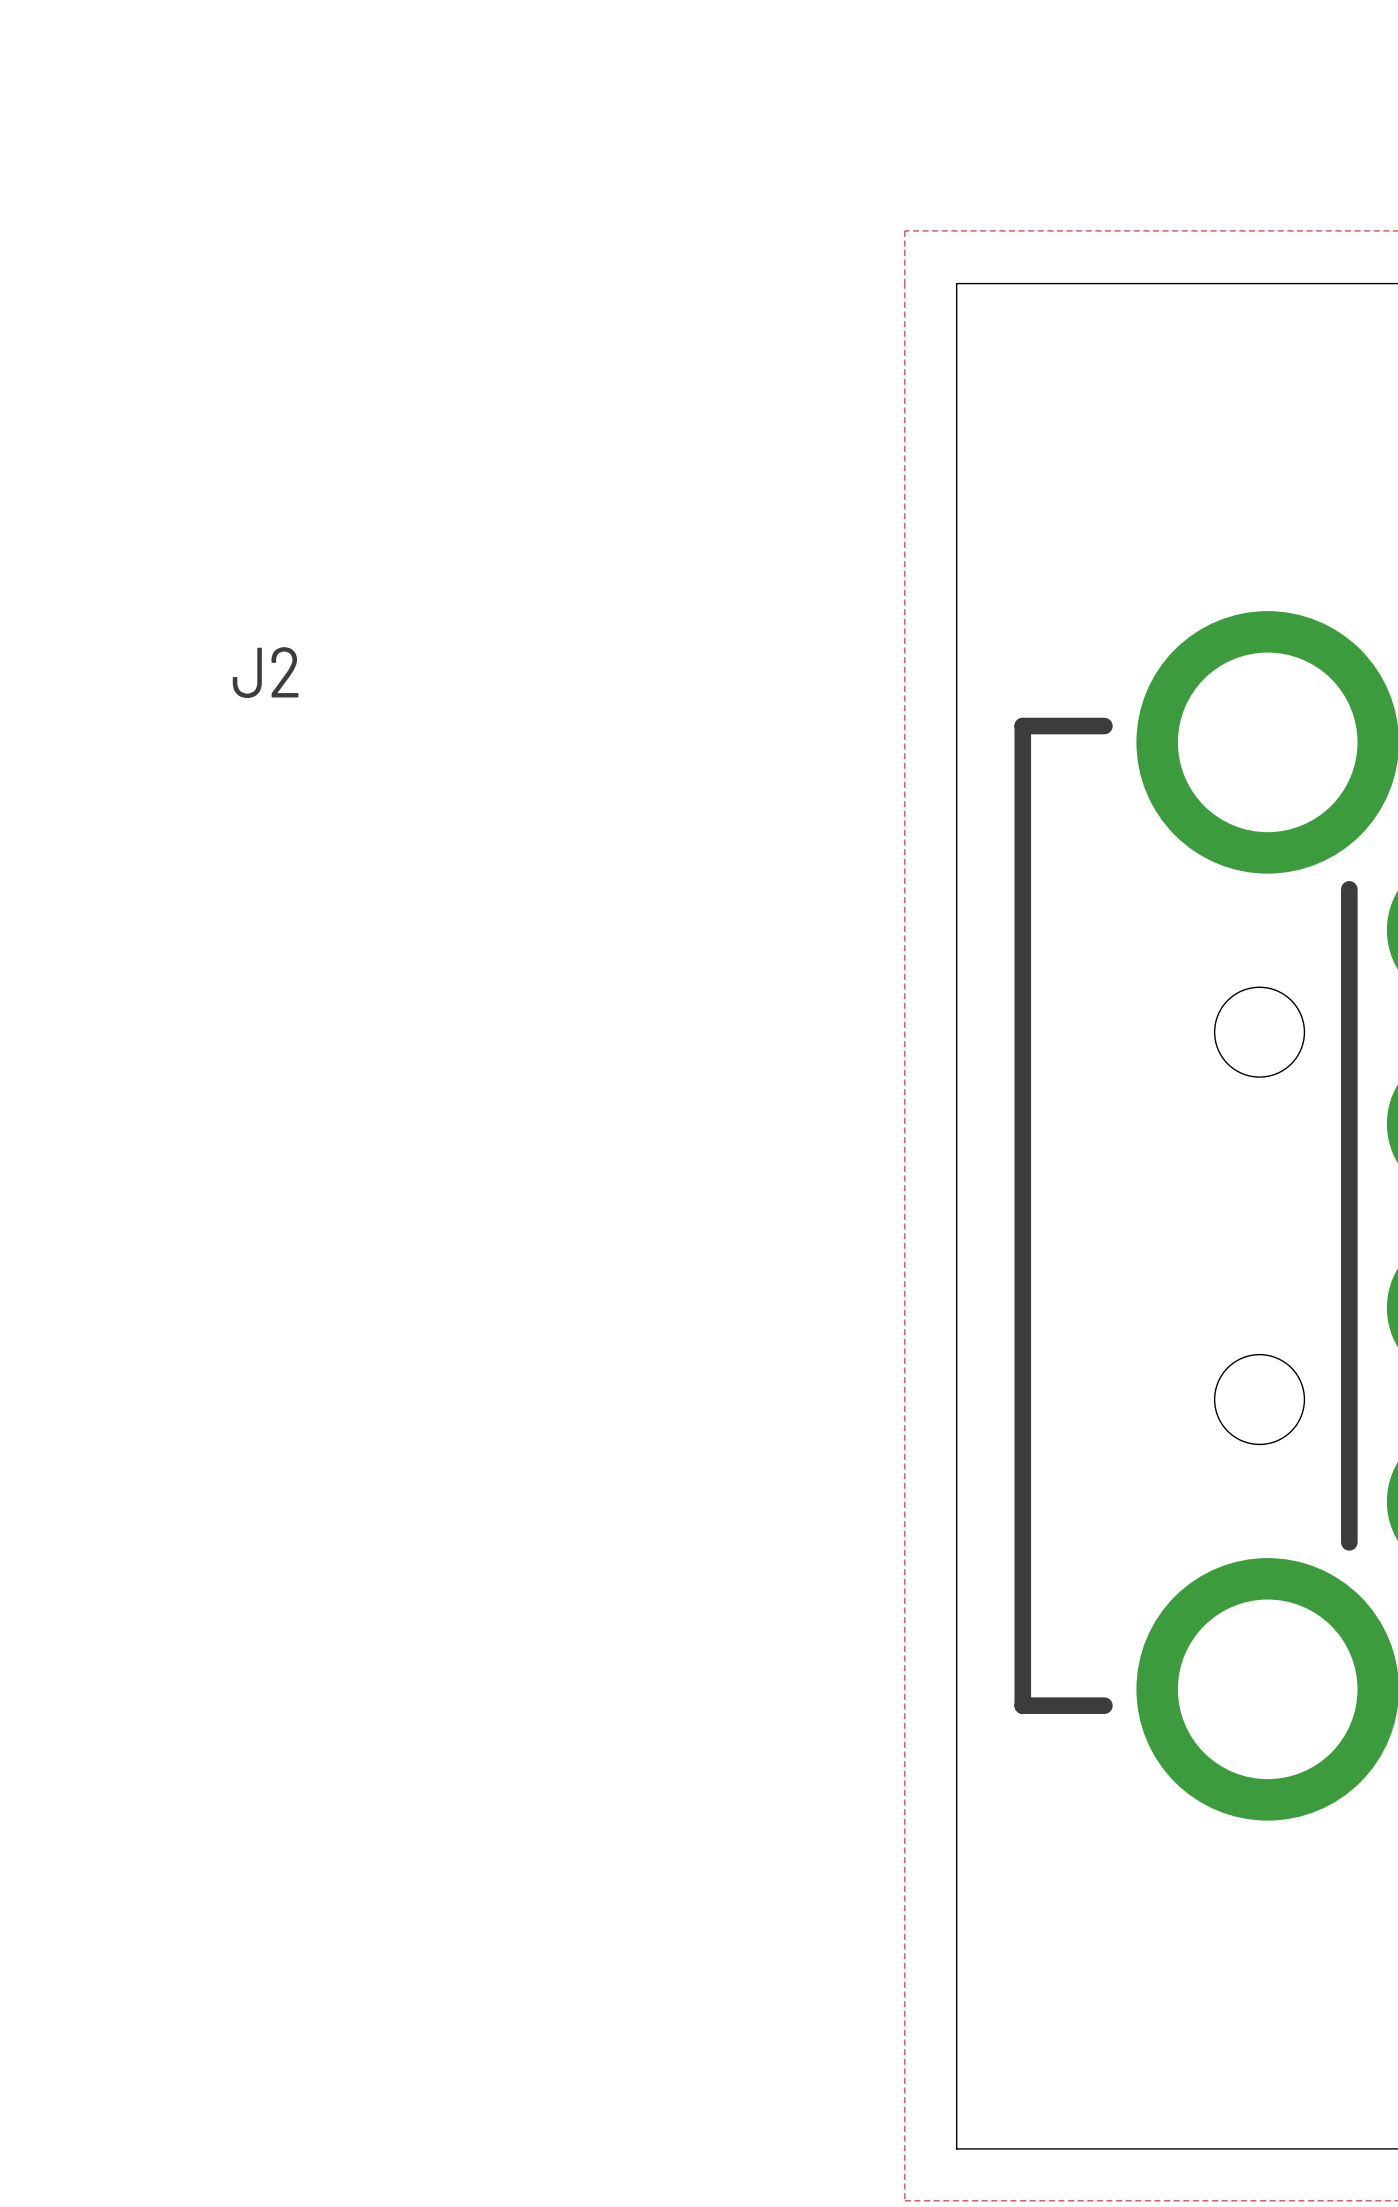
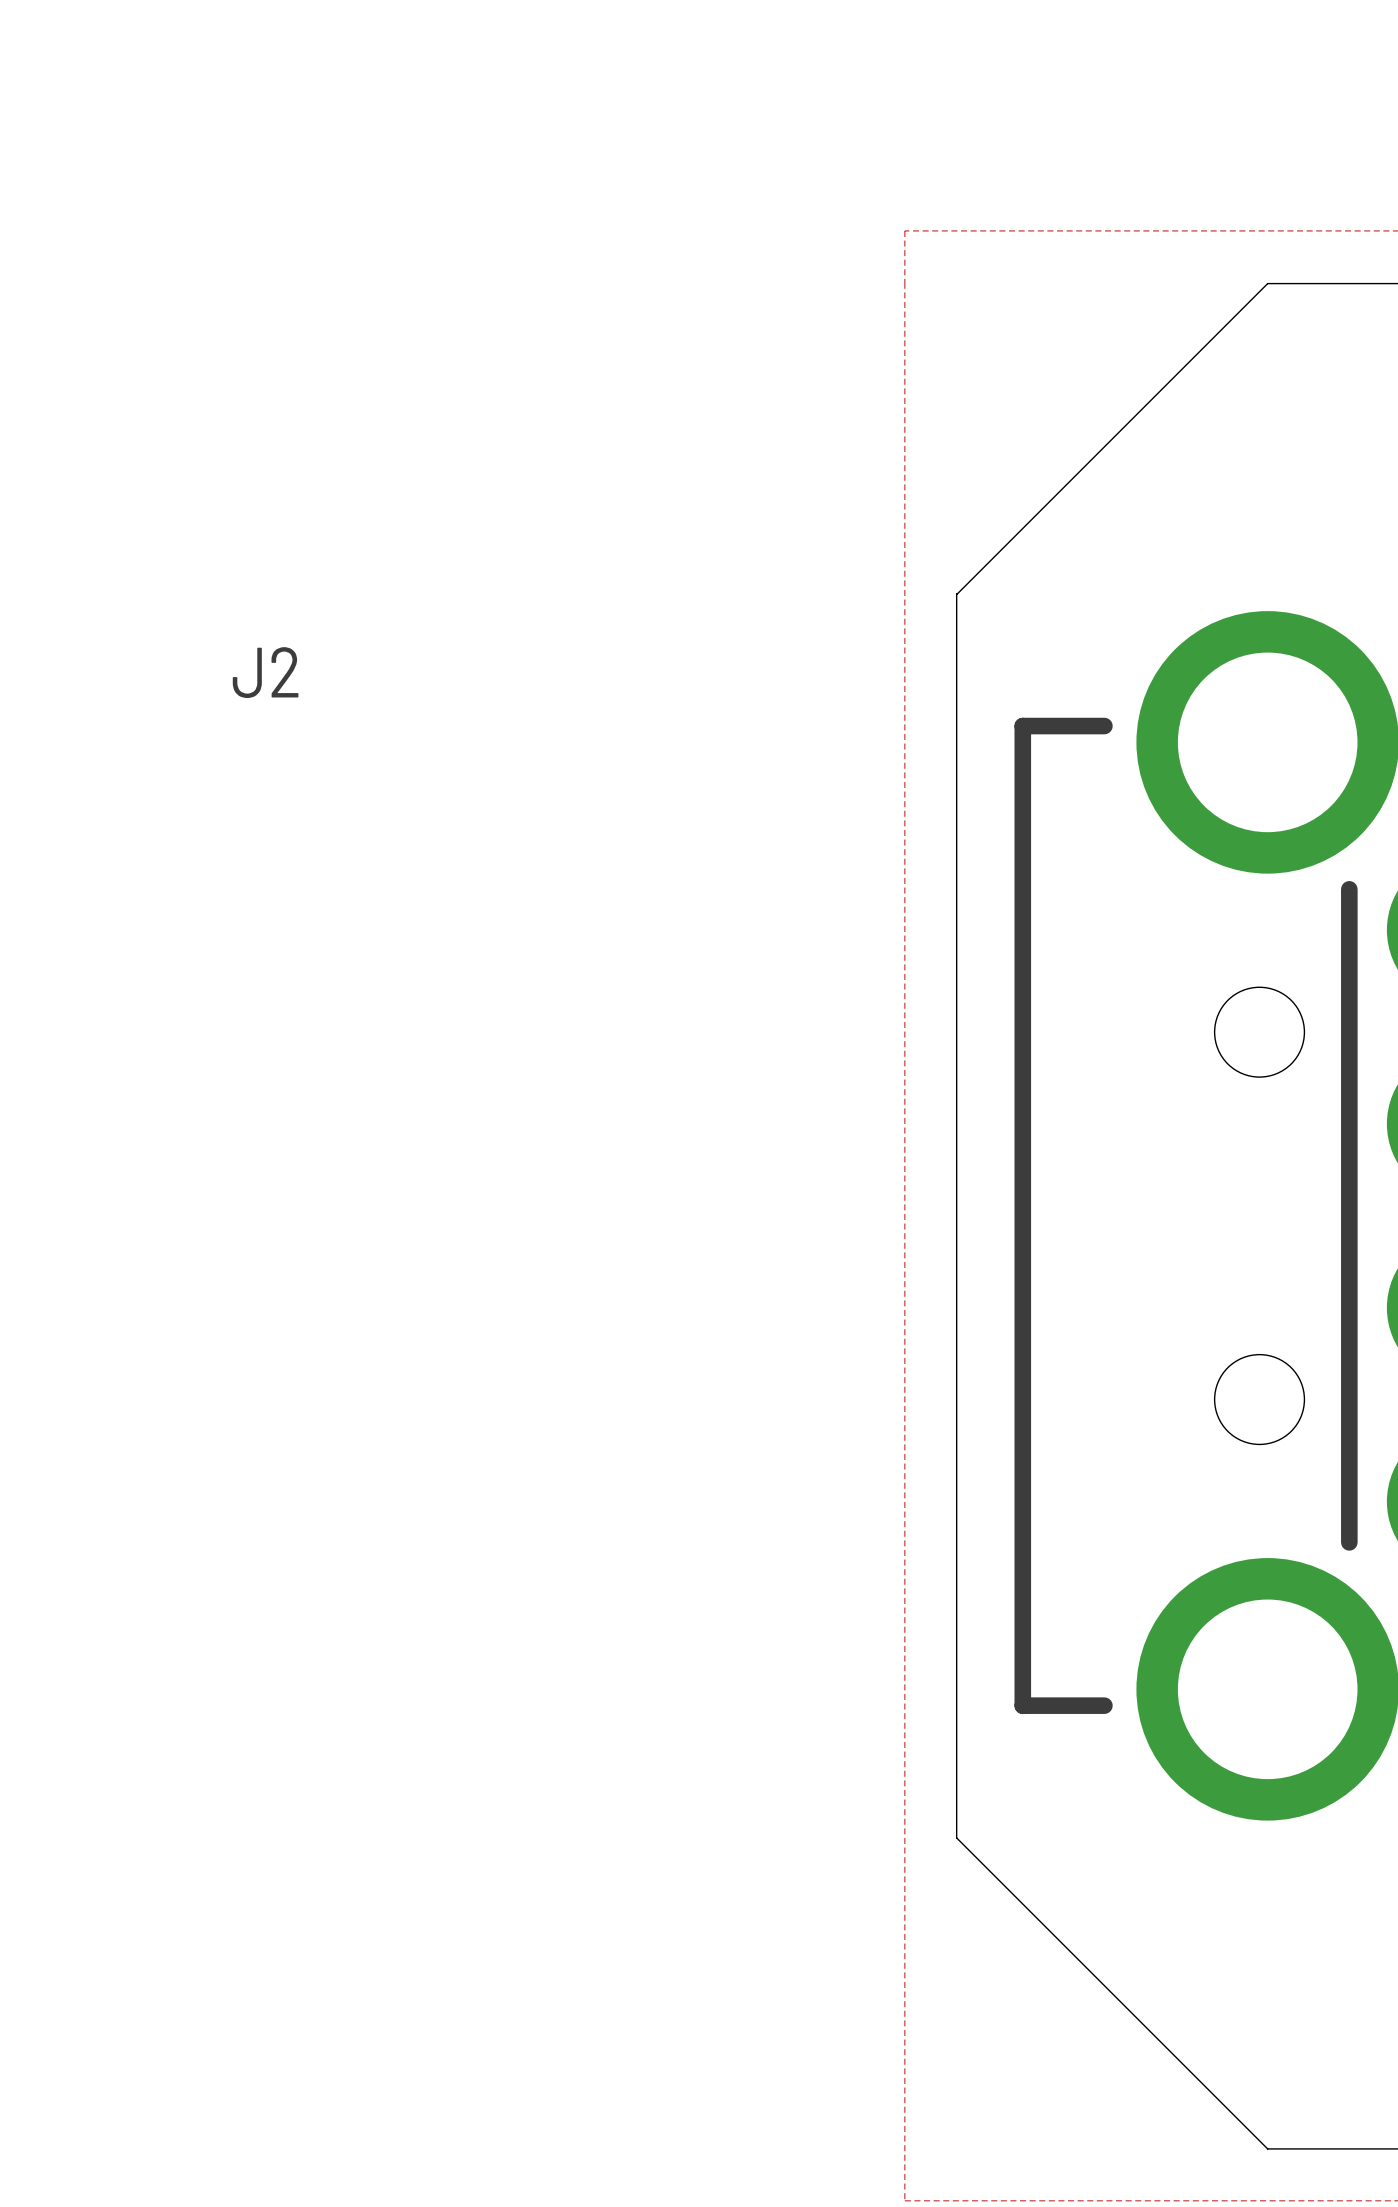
board edge: (1267, 283) (956, 283) (956, 593) -> (1267, 283) (957, 593)
board edge: (956, 1837) (956, 2148) (1267, 2148) -> (956, 1837) (1267, 2148)

